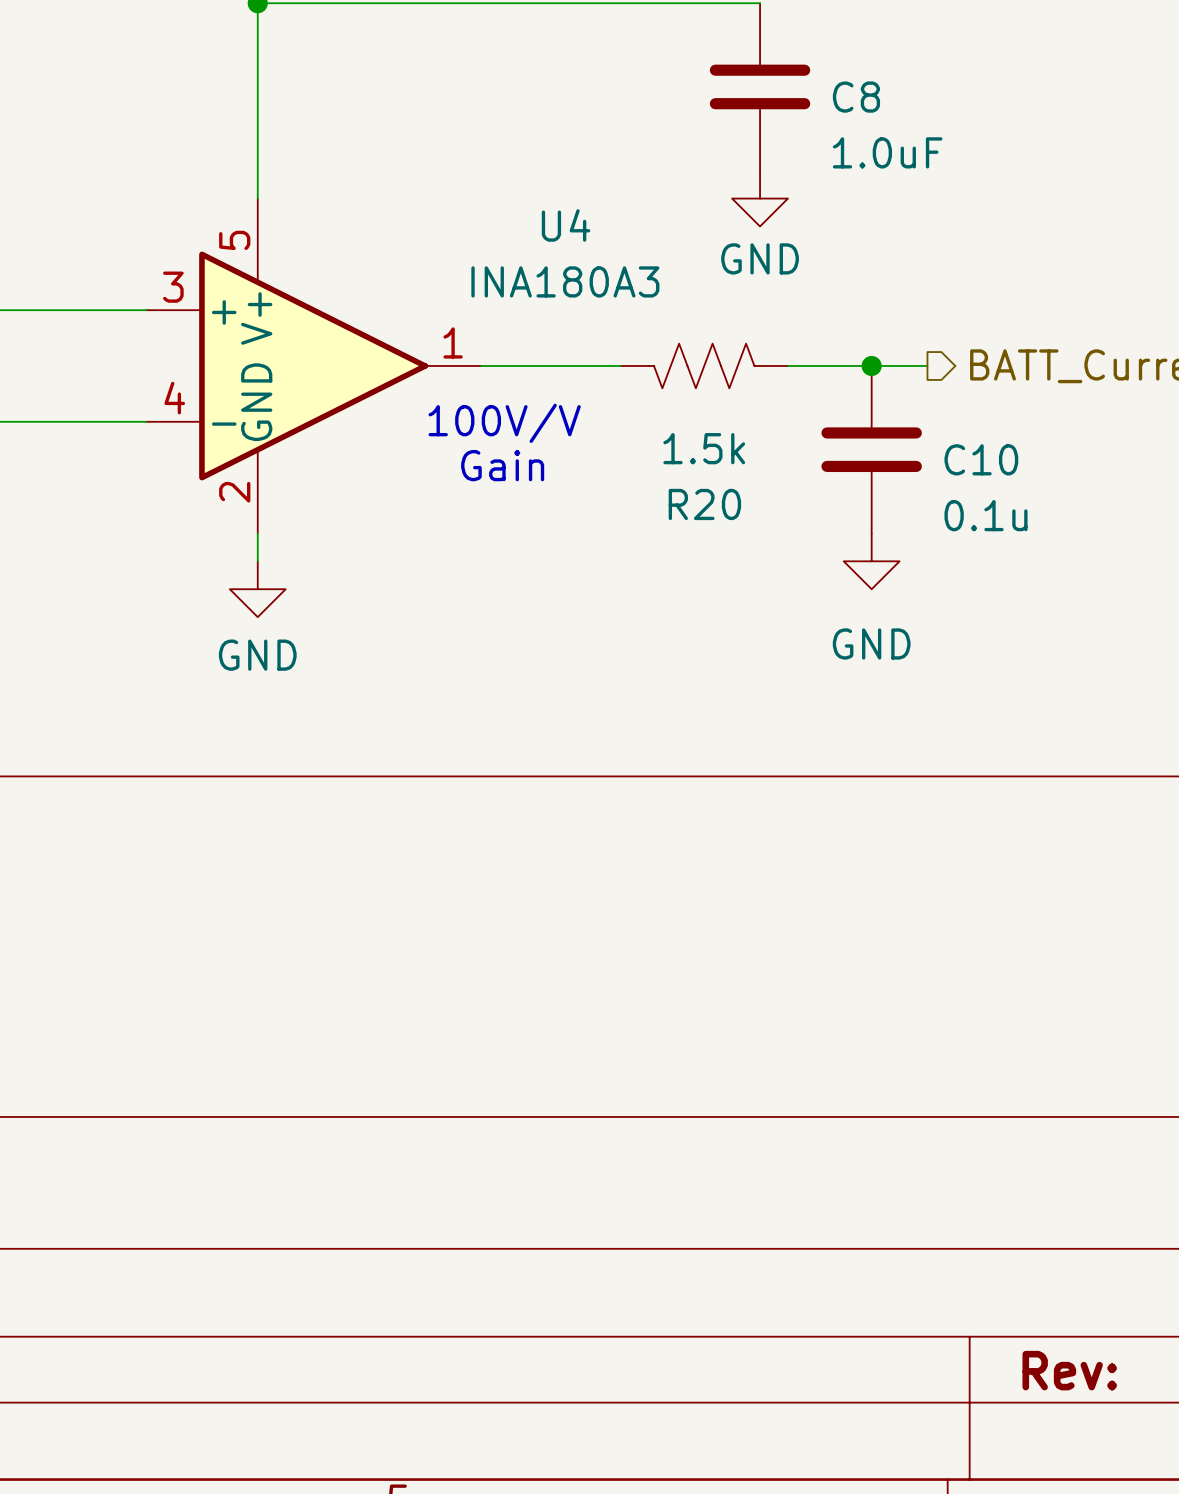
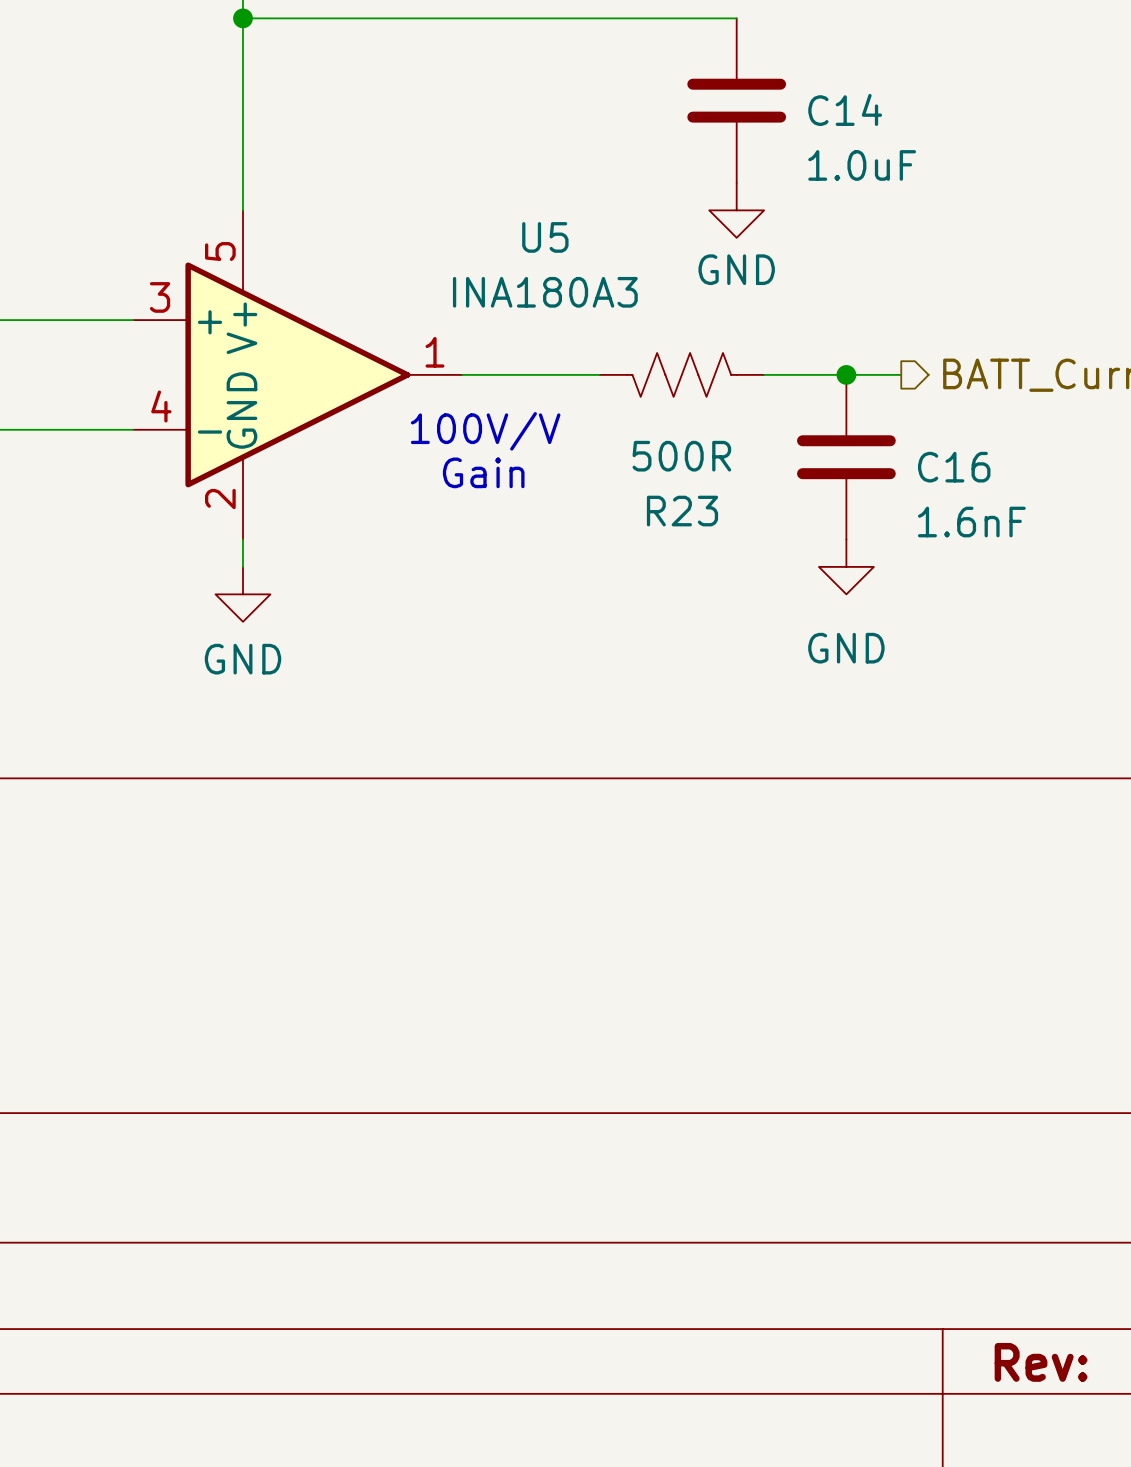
C8 name: C8 (856, 97) -> C14 (845, 109)
U4 name: U4 (566, 225) -> U5 (545, 237)
R20 value: 1.5k (704, 448) -> 500R (681, 456)
C10 name: C10 (981, 459) -> C16 (954, 467)
R20 name: R20 (704, 504) -> R23 (682, 511)
C10 value: 0.1u (986, 515) -> 1.6nF (971, 522)

